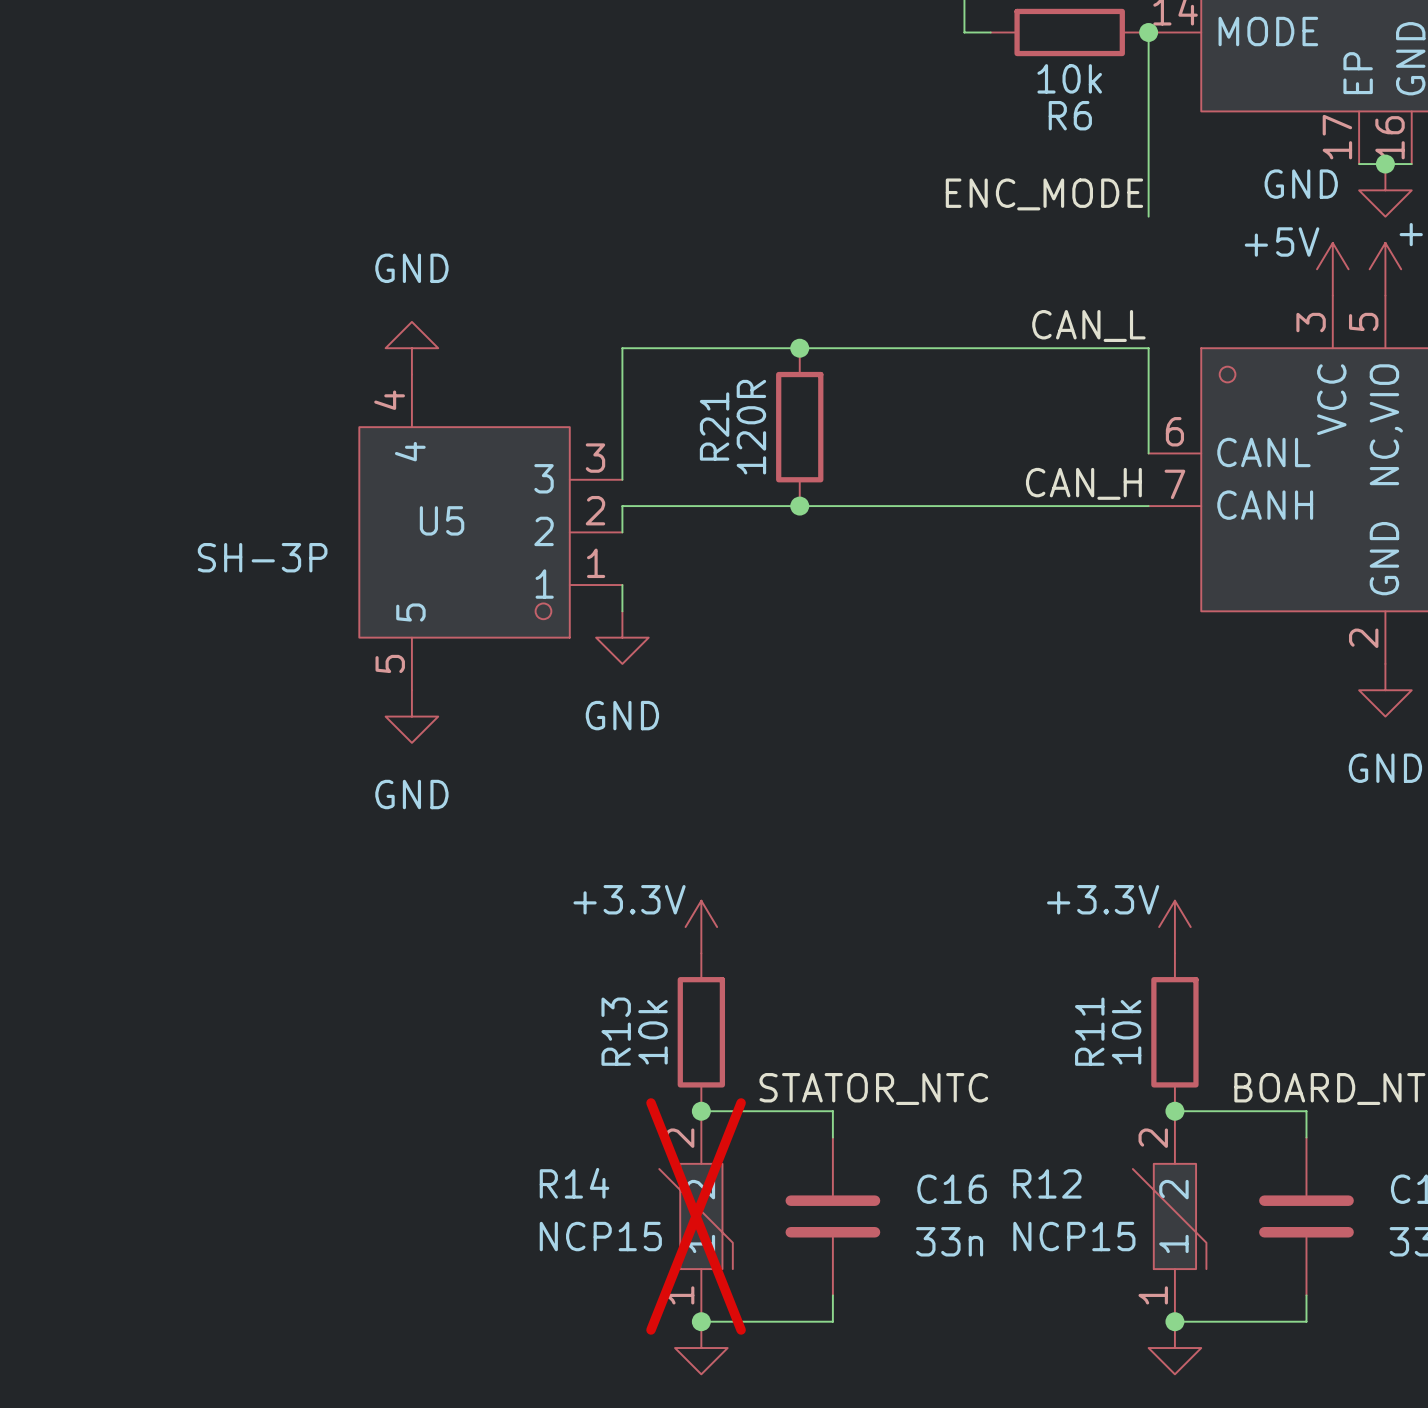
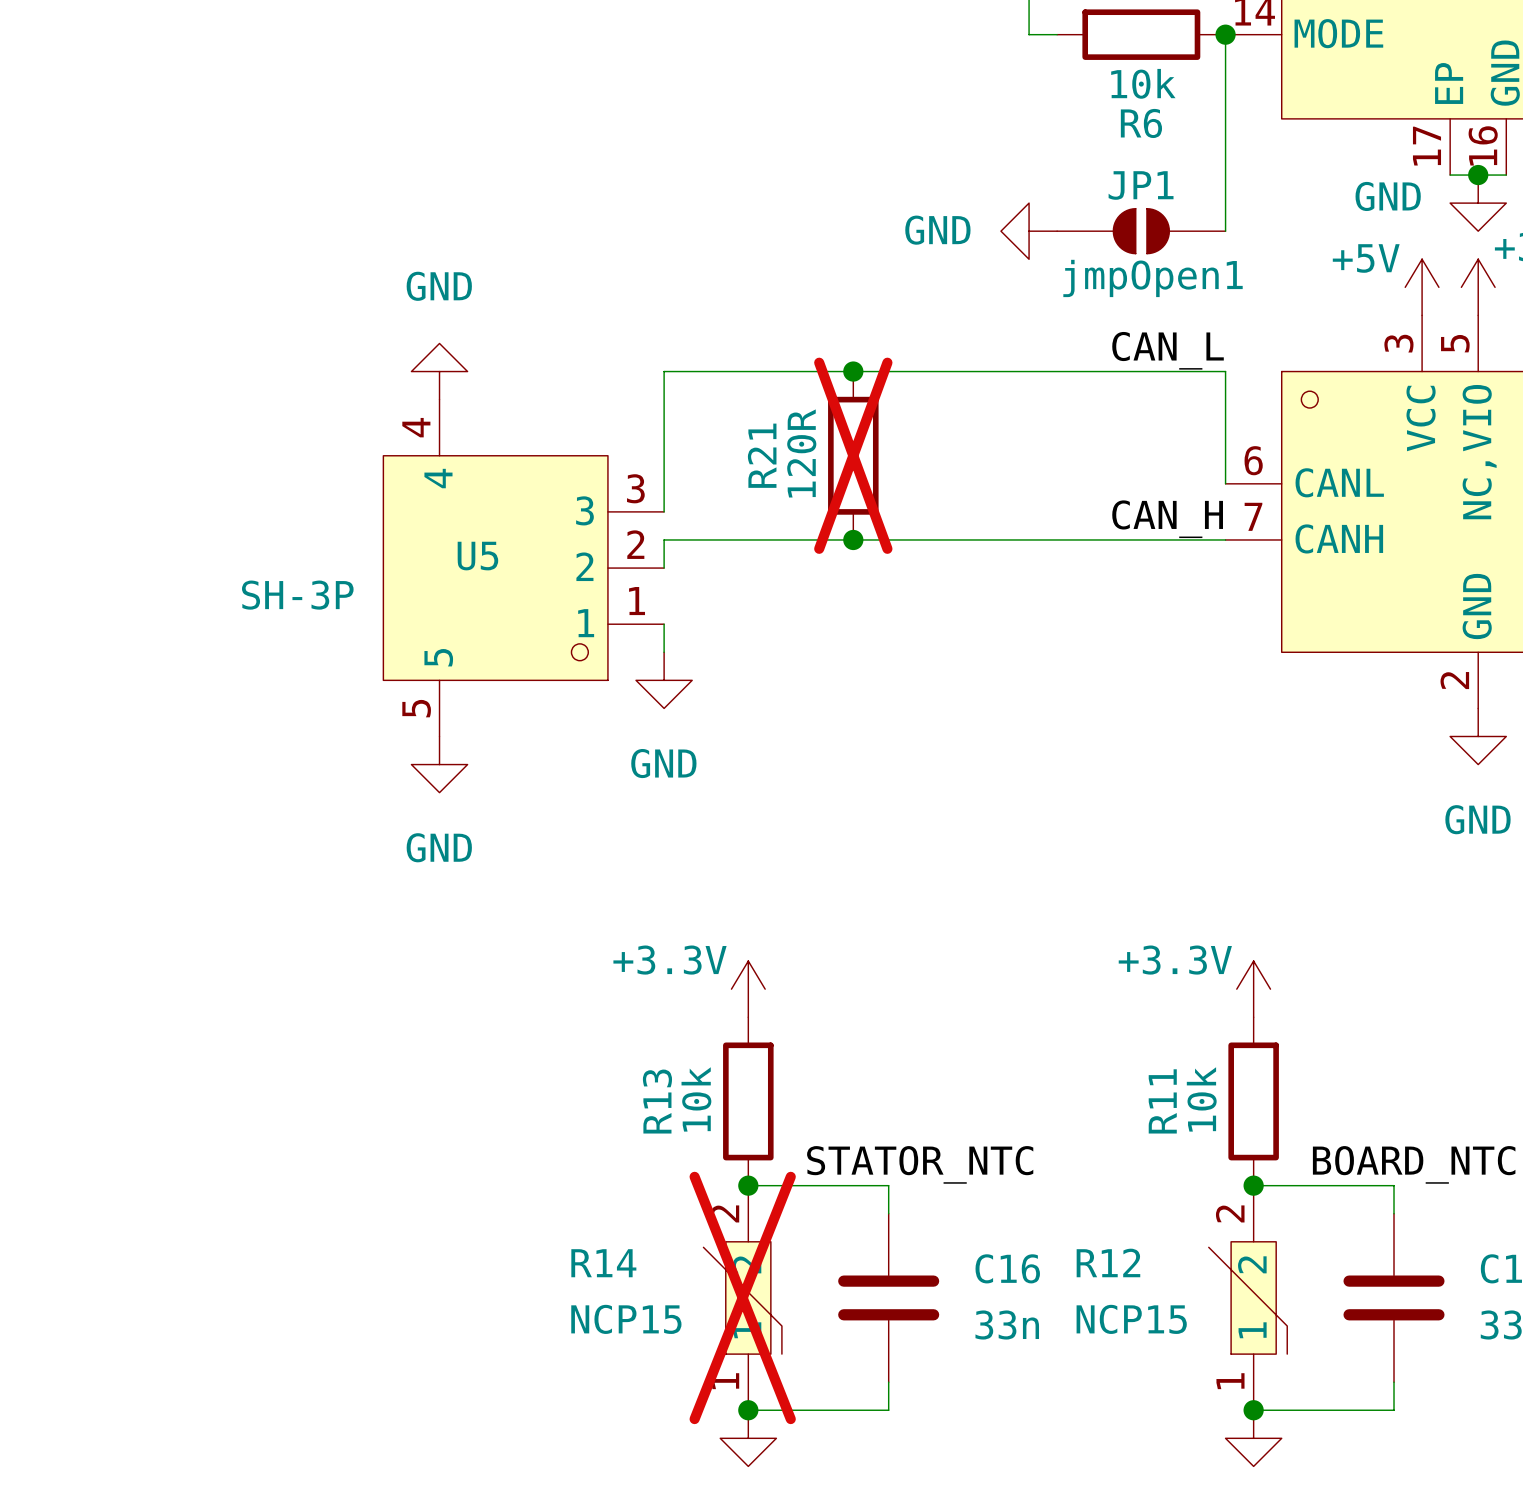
label: ENC_MODE (1044, 194) -> none
power symbol: none -> GND (1029, 231)
JP1: none -> jmpOpen1 (1141, 231)
R21 do-not-place cross: none -> (853, 455)

